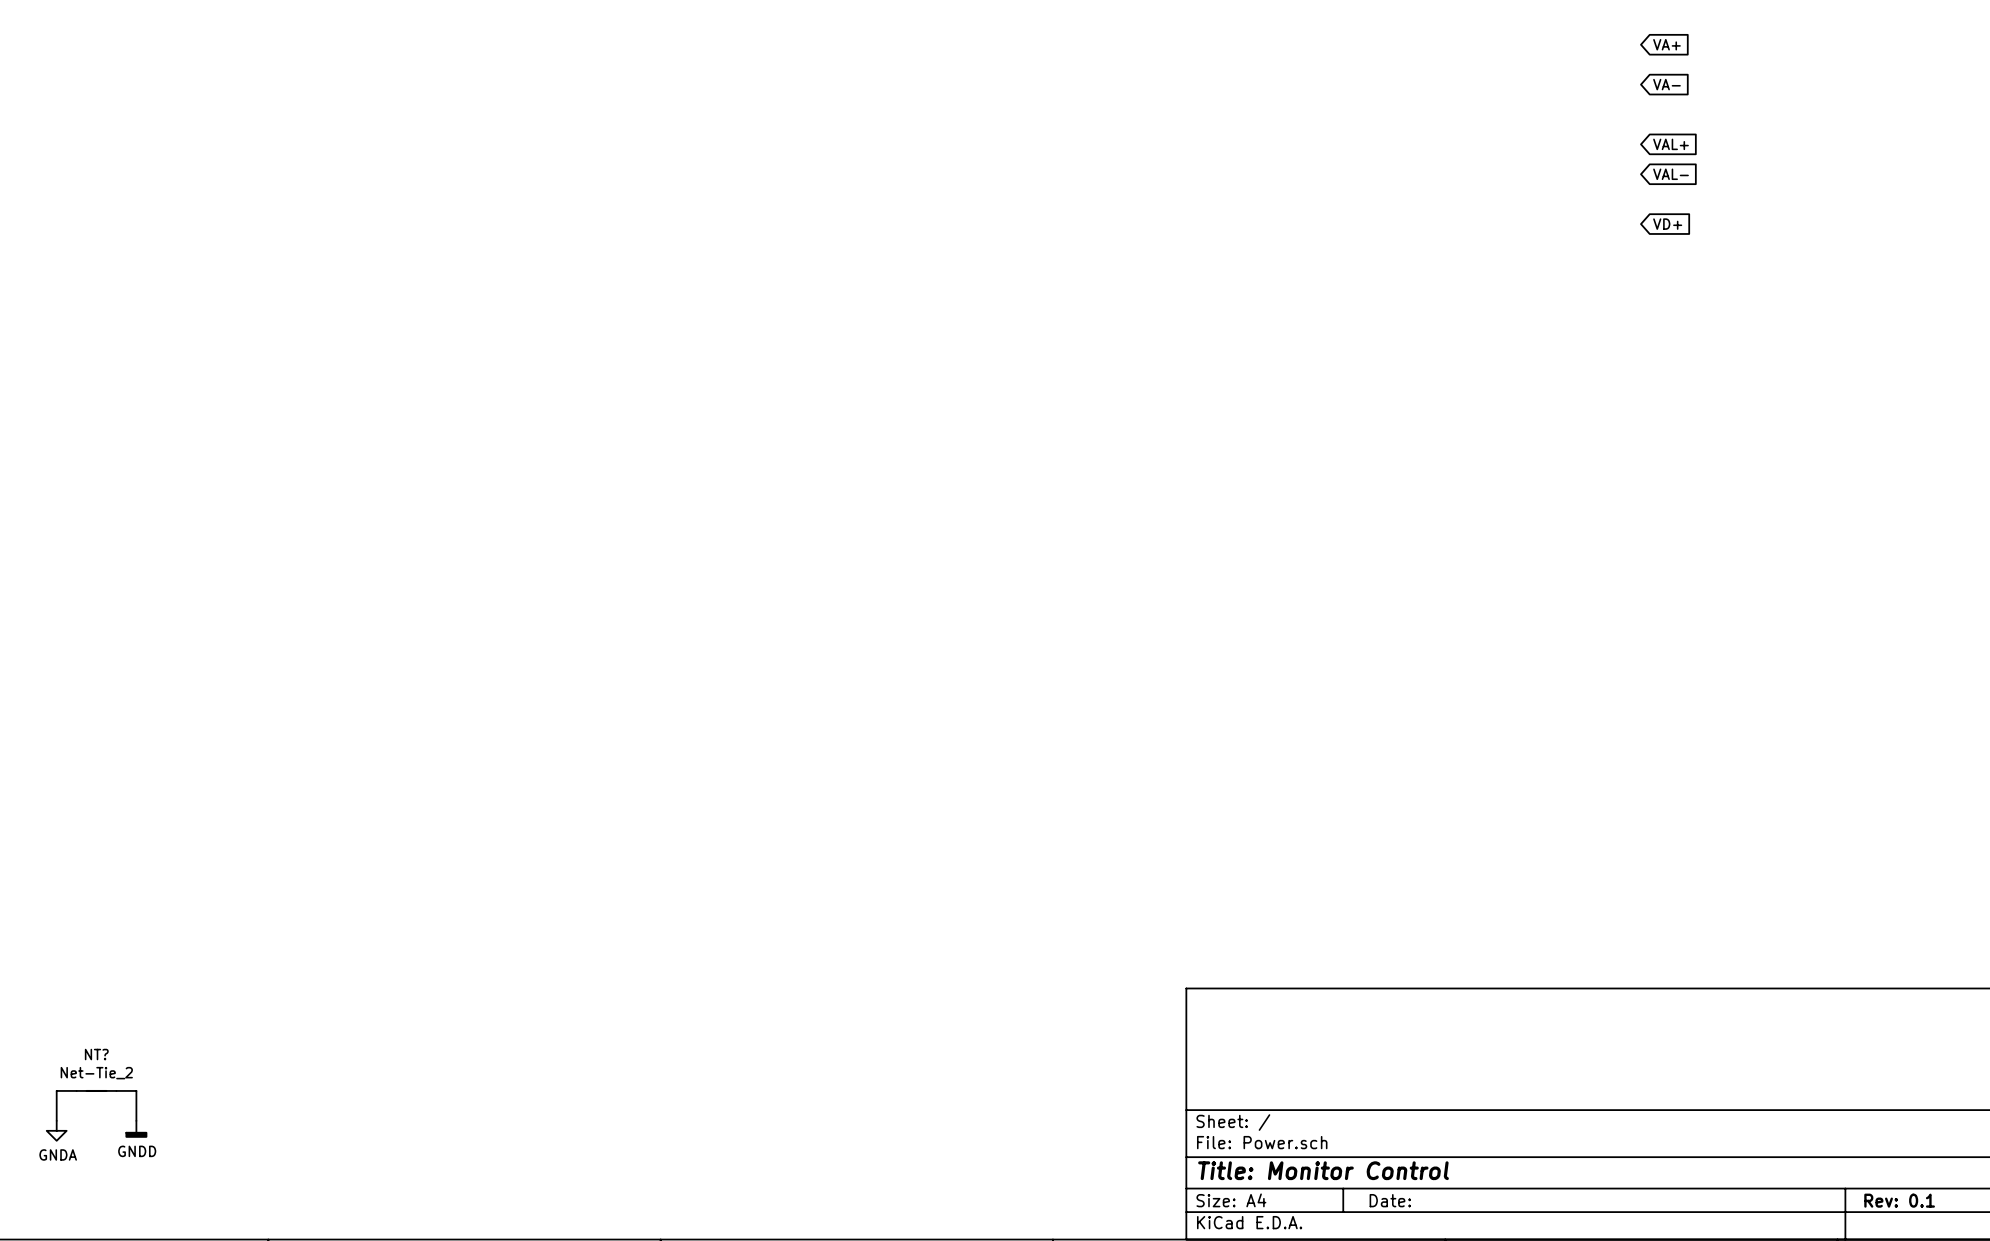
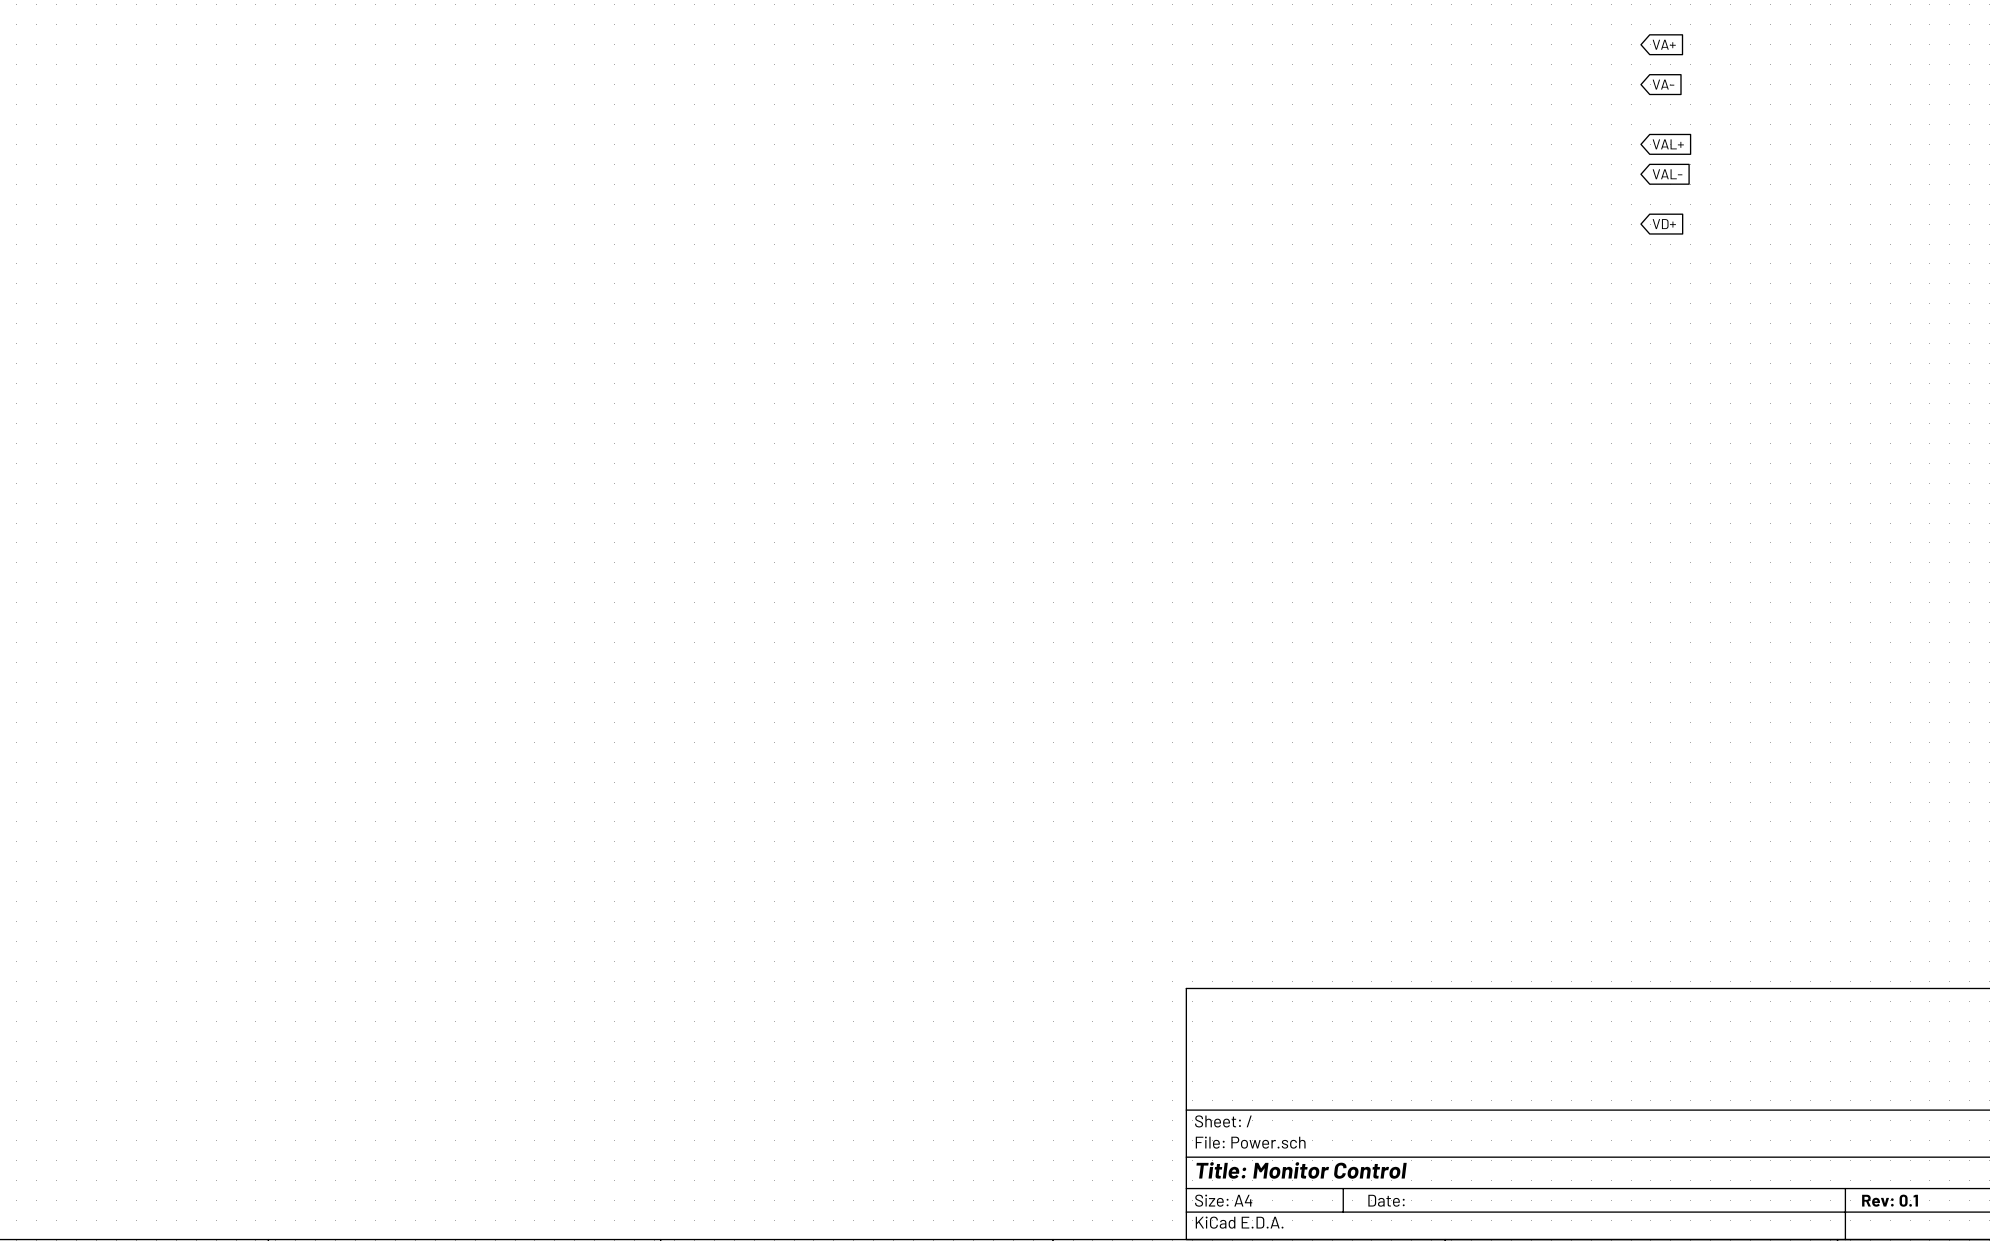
wire: (76, 1090) (56, 1090) (56, 1120) -> none
NT?: Net-Tie_2 (96, 1090) -> none
wire: (116, 1090) (136, 1090) (136, 1120) -> none
power symbol: GNDD (136, 1129) -> none
power symbol: GNDA (56, 1130) -> none

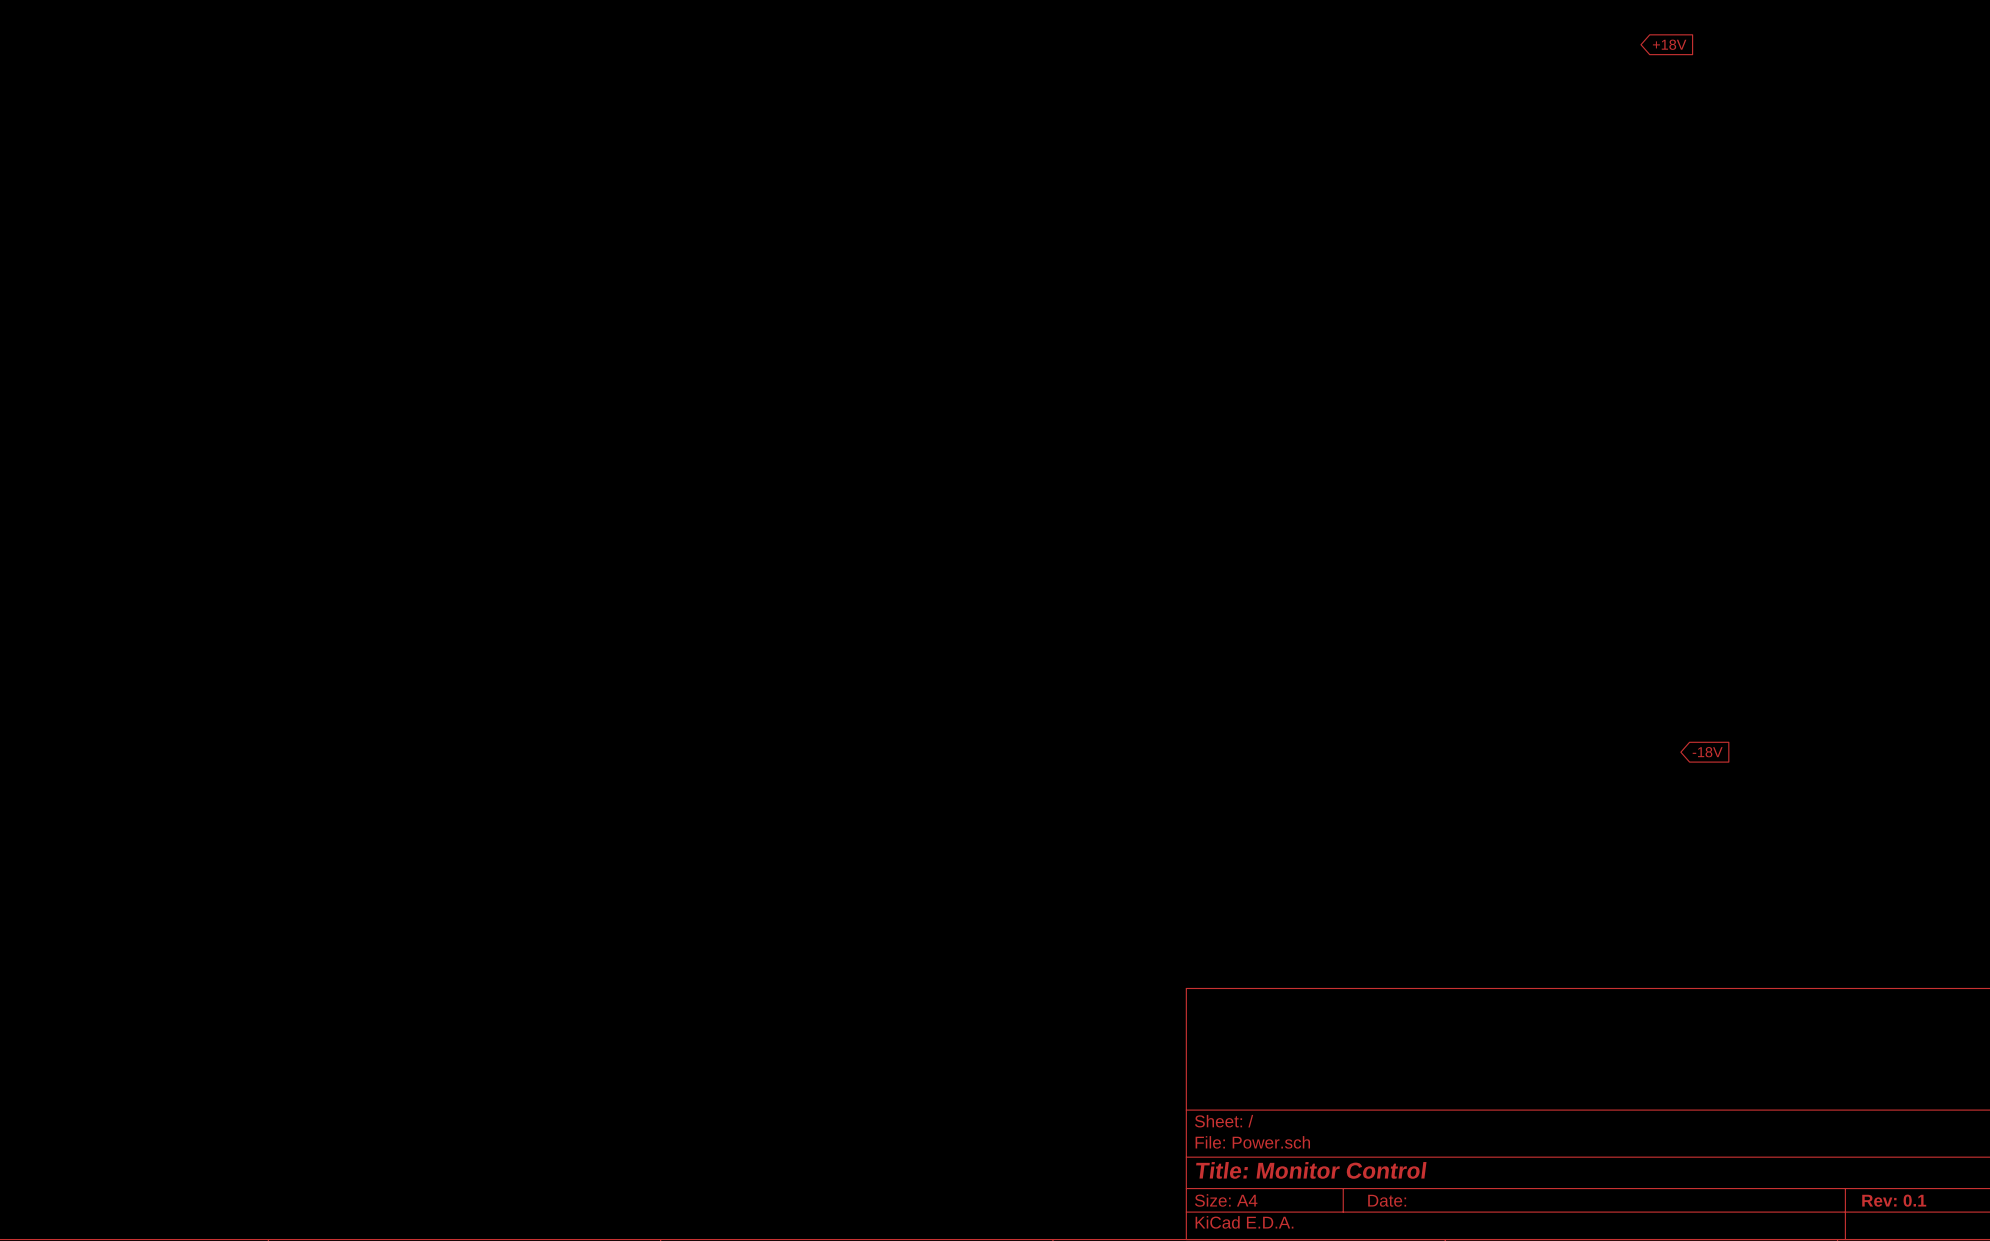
global label: VA+ (1664, 44) -> +18V (1669, 44)
global label: VA- (1663, 84) -> none
global label: VAL+ (1668, 144) -> none
global label: VAL- (1667, 174) -> none
global label: VD+ (1664, 224) -> none
global label: none -> -18V (1707, 752)

